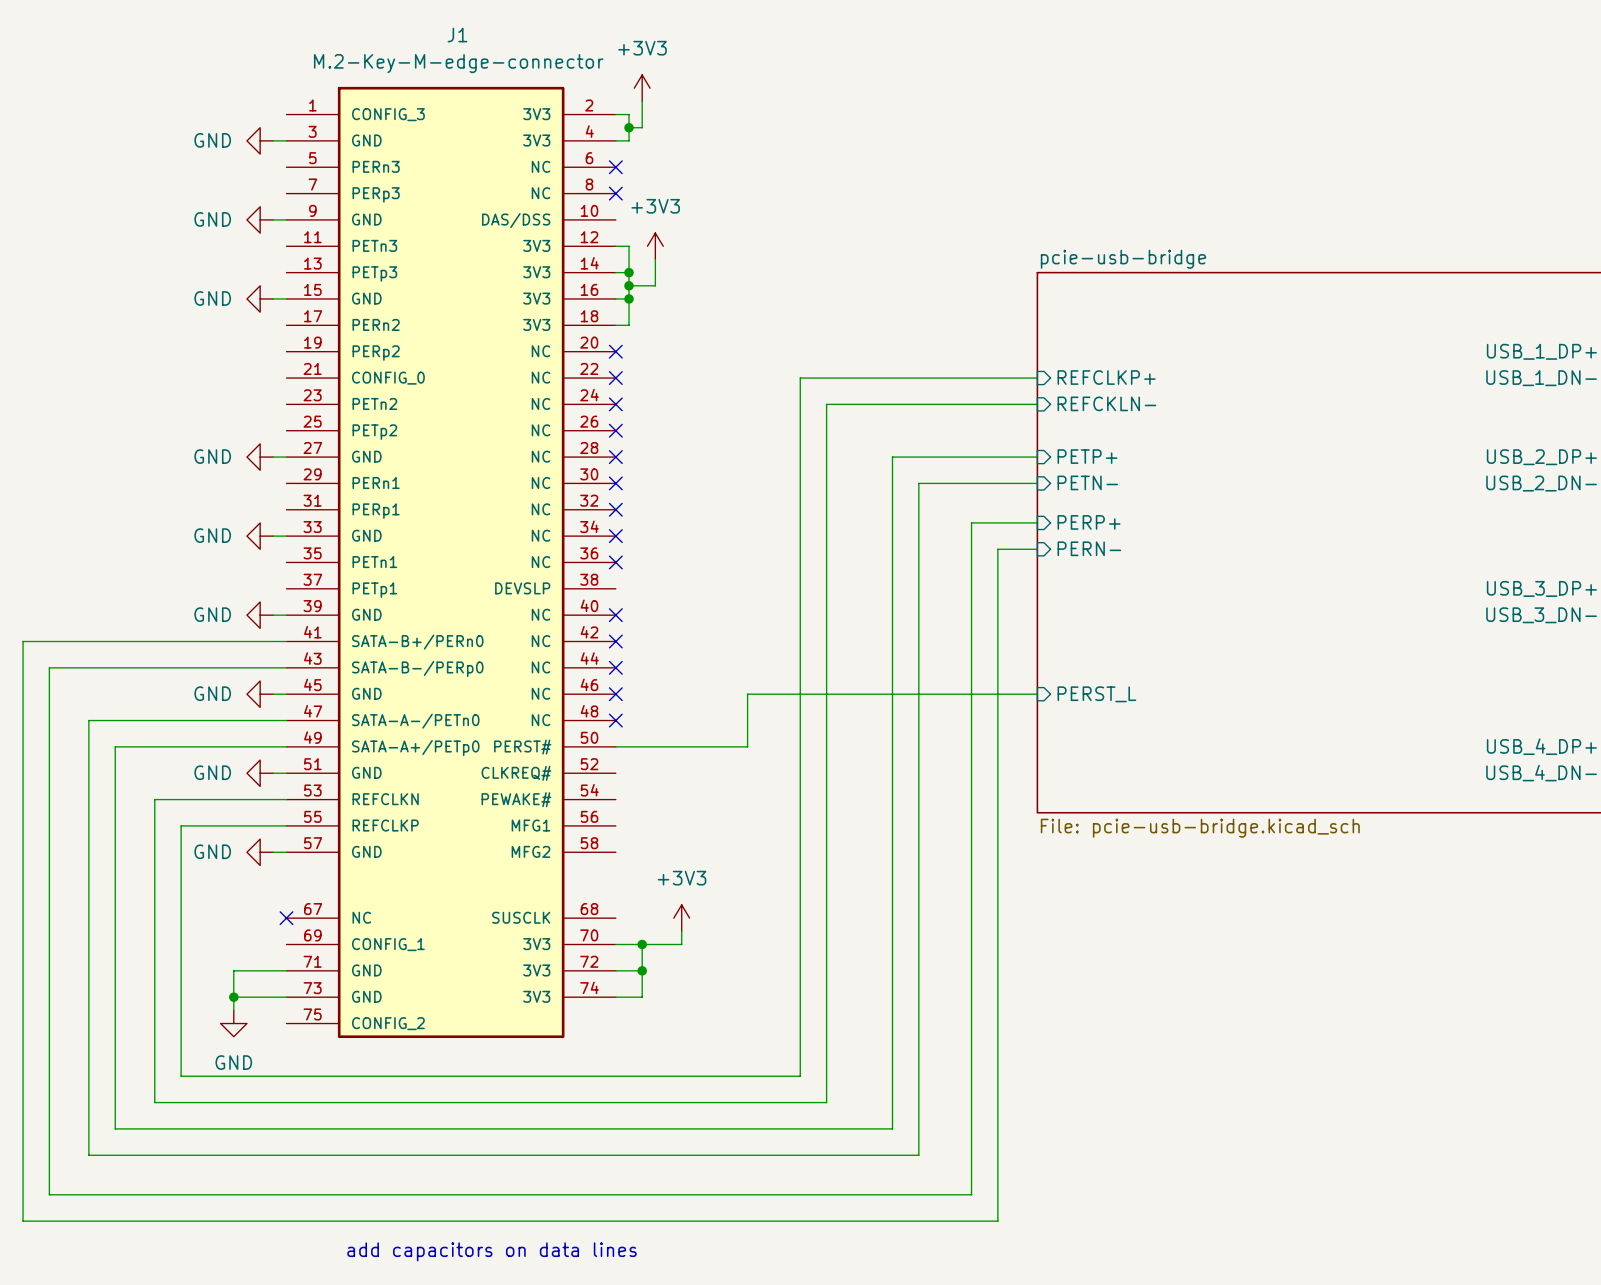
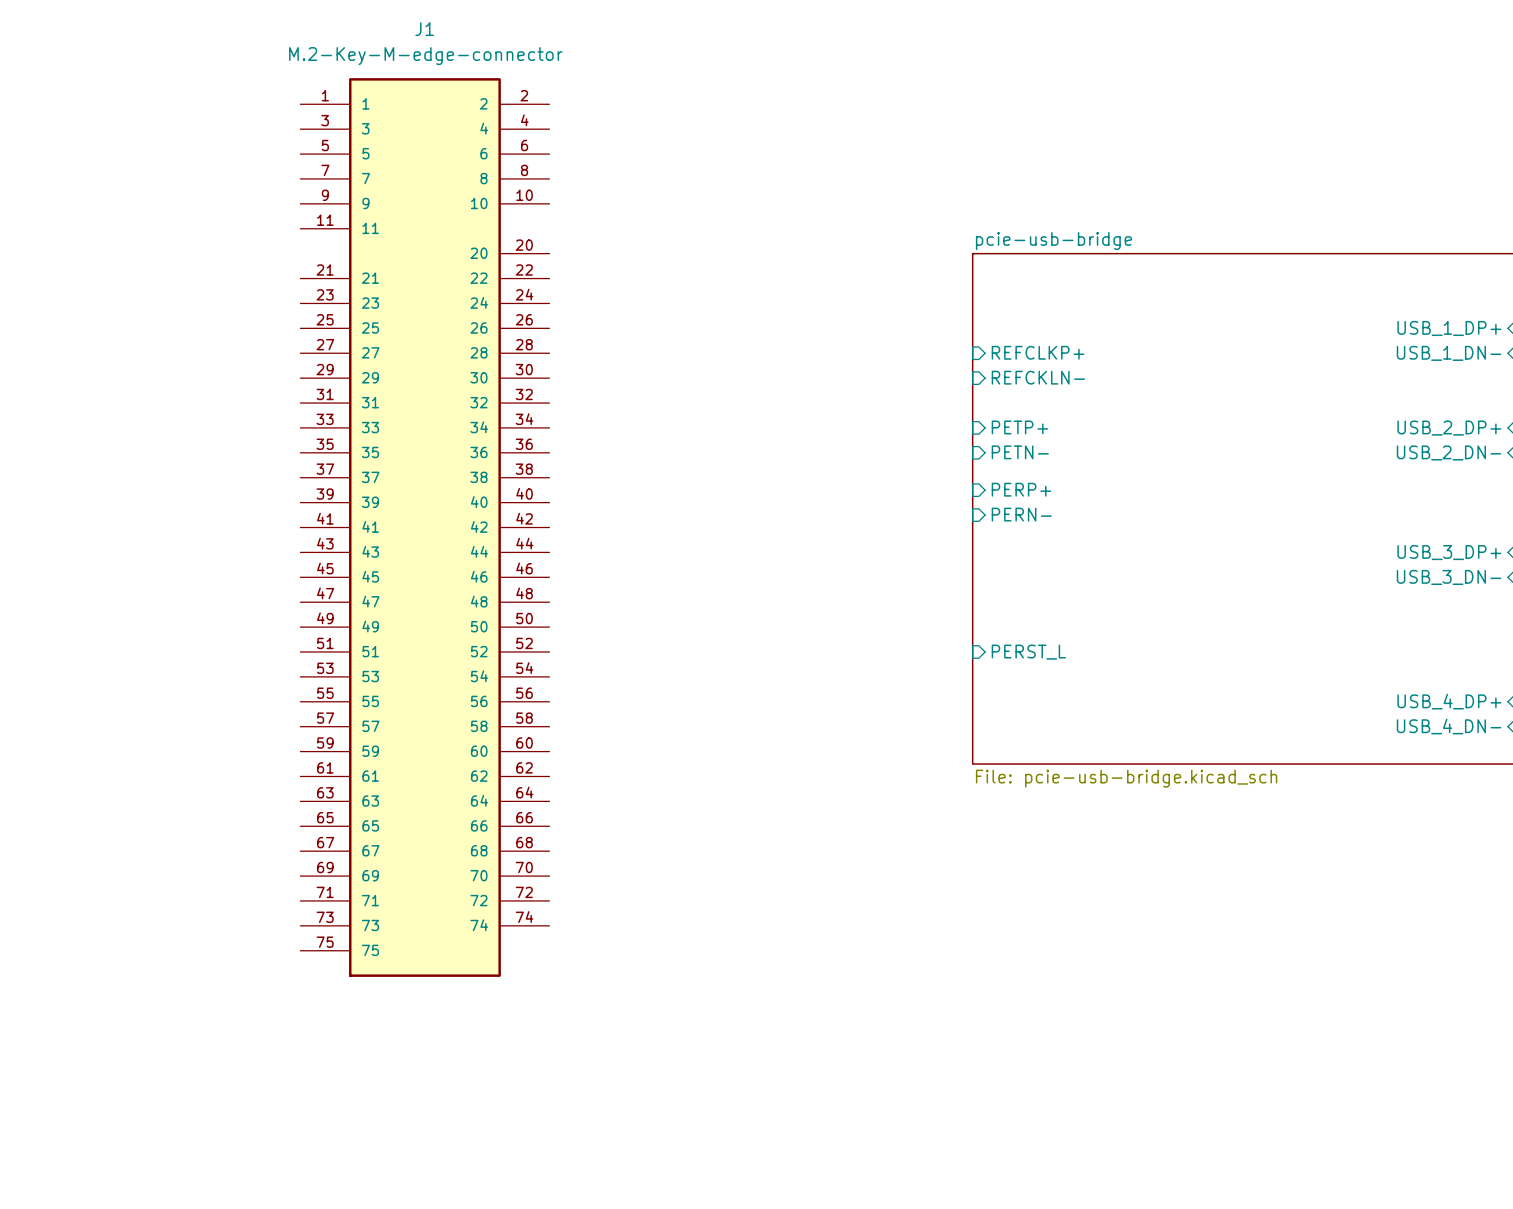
J1 symbol: [286, 86, 616, 1039] -> [300, 78, 550, 977]
power symbol: +3V3 (642, 88) -> none
wire: (642, 101) (642, 127) (629, 127) -> none
wire: (615, 114) (629, 114) (629, 140) (615, 140) -> none
junction: (629, 127) -> none
power symbol: GND (260, 140) -> none
wire: (273, 140) (286, 140) -> none
no-connect mark: (615, 167) -> none
no-connect mark: (615, 193) -> none
power symbol: GND (260, 219) -> none
wire: (273, 219) (286, 219) -> none
wire: (615, 246) (629, 246) (629, 325) (615, 325) -> none
power symbol: +3V3 (655, 246) -> none
wire: (655, 259) (655, 285) (629, 285) -> none
wire: (615, 272) (629, 272) -> none
junction: (629, 272) -> none
junction: (629, 285) -> none
power symbol: GND (260, 298) -> none
wire: (273, 298) (286, 298) -> none
wire: (615, 298) (629, 298) -> none
junction: (629, 298) -> none
no-connect mark: (615, 351) -> none
no-connect mark: (615, 378) -> none
wire: (1037, 378) (800, 378) (800, 1076) (181, 1076) (181, 825) (286, 825) -> none
no-connect mark: (615, 404) -> none
wire: (1037, 404) (826, 404) (826, 1102) (154, 1102) (154, 799) (286, 799) -> none
no-connect mark: (615, 430) -> none
power symbol: GND (260, 457) -> none
wire: (273, 457) (286, 457) -> none
no-connect mark: (615, 457) -> none
wire: (1037, 457) (892, 457) (892, 1128) (115, 1128) (115, 746) (286, 746) -> none
no-connect mark: (615, 483) -> none
wire: (1037, 483) (918, 483) (918, 1155) (88, 1155) (88, 720) (286, 720) -> none
no-connect mark: (615, 509) -> none
wire: (1037, 522) (971, 522) (971, 1194) (49, 1194) (49, 667) (286, 667) -> none
power symbol: GND (260, 536) -> none
wire: (273, 536) (286, 536) -> none
no-connect mark: (615, 536) -> none
wire: (1037, 549) (997, 549) (997, 1221) (23, 1221) (23, 641) (286, 641) -> none
no-connect mark: (615, 562) -> none
power symbol: GND (260, 615) -> none
wire: (273, 615) (286, 615) -> none
no-connect mark: (615, 615) -> none
no-connect mark: (615, 641) -> none
no-connect mark: (615, 667) -> none
power symbol: GND (260, 694) -> none
wire: (273, 694) (286, 694) -> none
no-connect mark: (615, 694) -> none
wire: (1037, 694) (747, 694) (747, 746) (615, 746) -> none
no-connect mark: (615, 720) -> none
power symbol: GND (260, 773) -> none
wire: (273, 773) (286, 773) -> none
power symbol: GND (260, 852) -> none
wire: (273, 852) (286, 852) -> none
no-connect mark: (286, 918) -> none
power symbol: +3V3 (681, 918) -> none
wire: (681, 931) (681, 944) (615, 944) -> none
wire: (642, 944) (642, 997) (615, 997) -> none
junction: (642, 944) -> none
wire: (286, 970) (233, 970) (233, 1010) -> none
wire: (615, 970) (642, 970) -> none
junction: (642, 970) -> none
wire: (233, 997) (286, 997) -> none
junction: (233, 997) -> none
power symbol: GND (233, 1023) -> none
text: add capacitors on data lines (492, 1251) -> none

